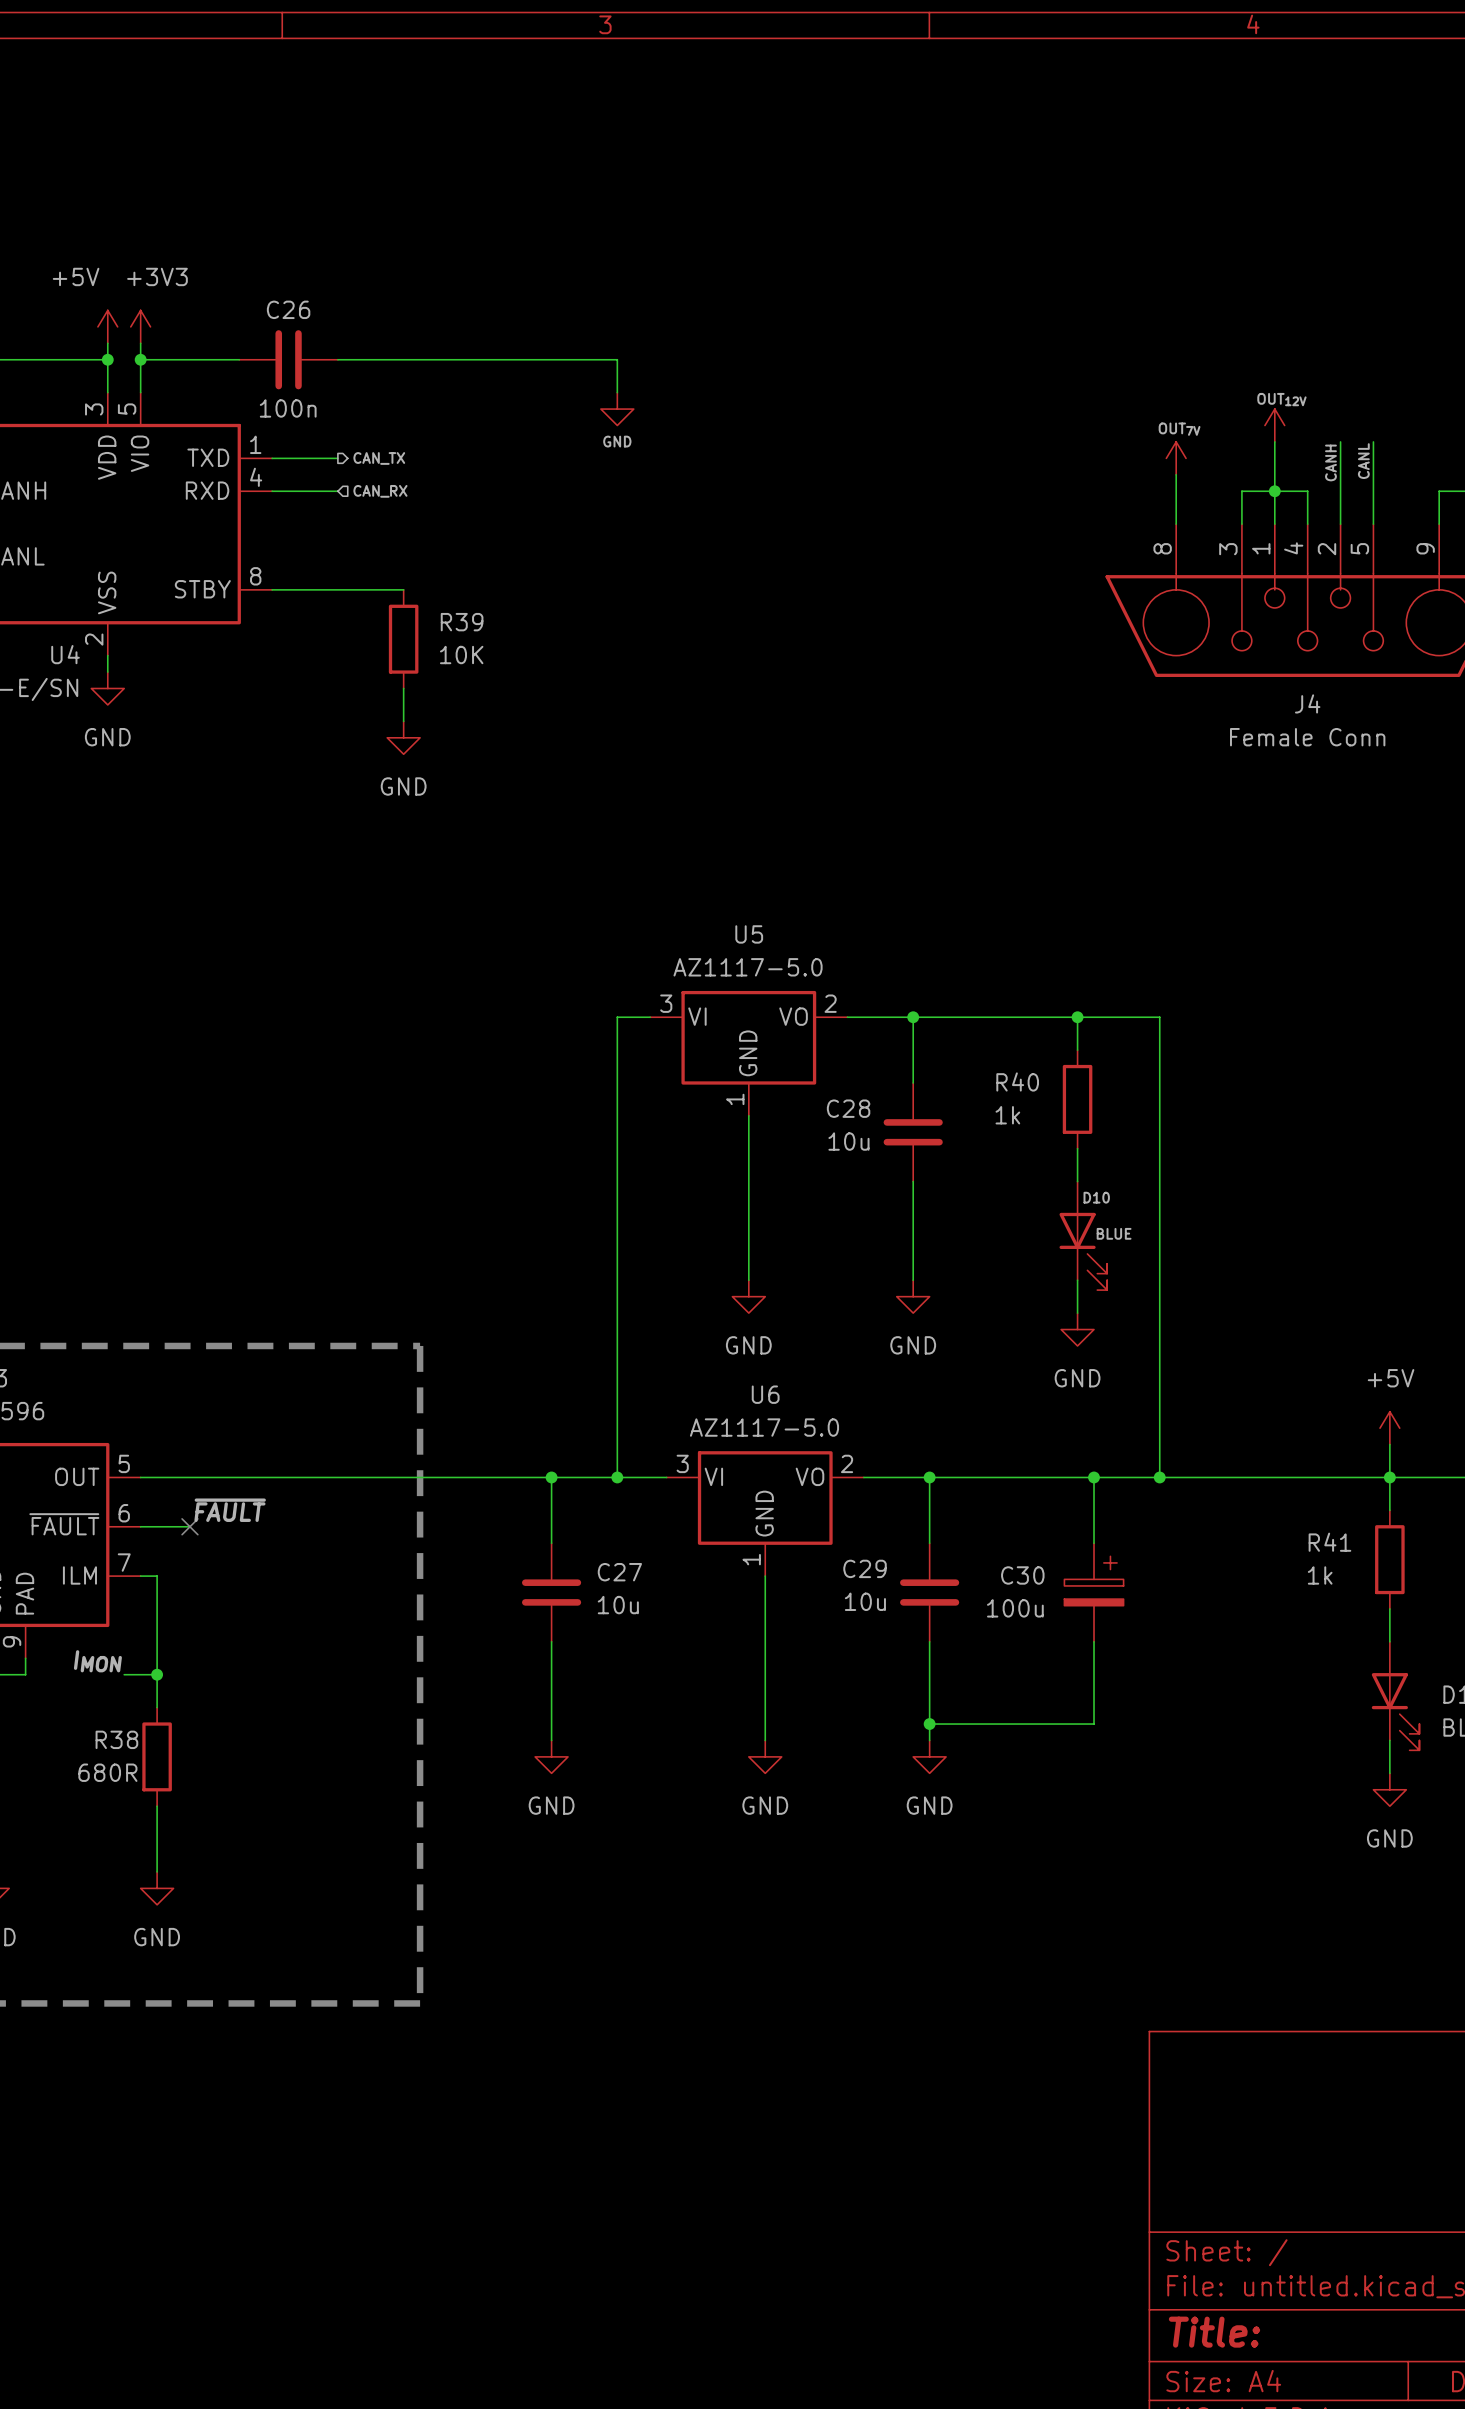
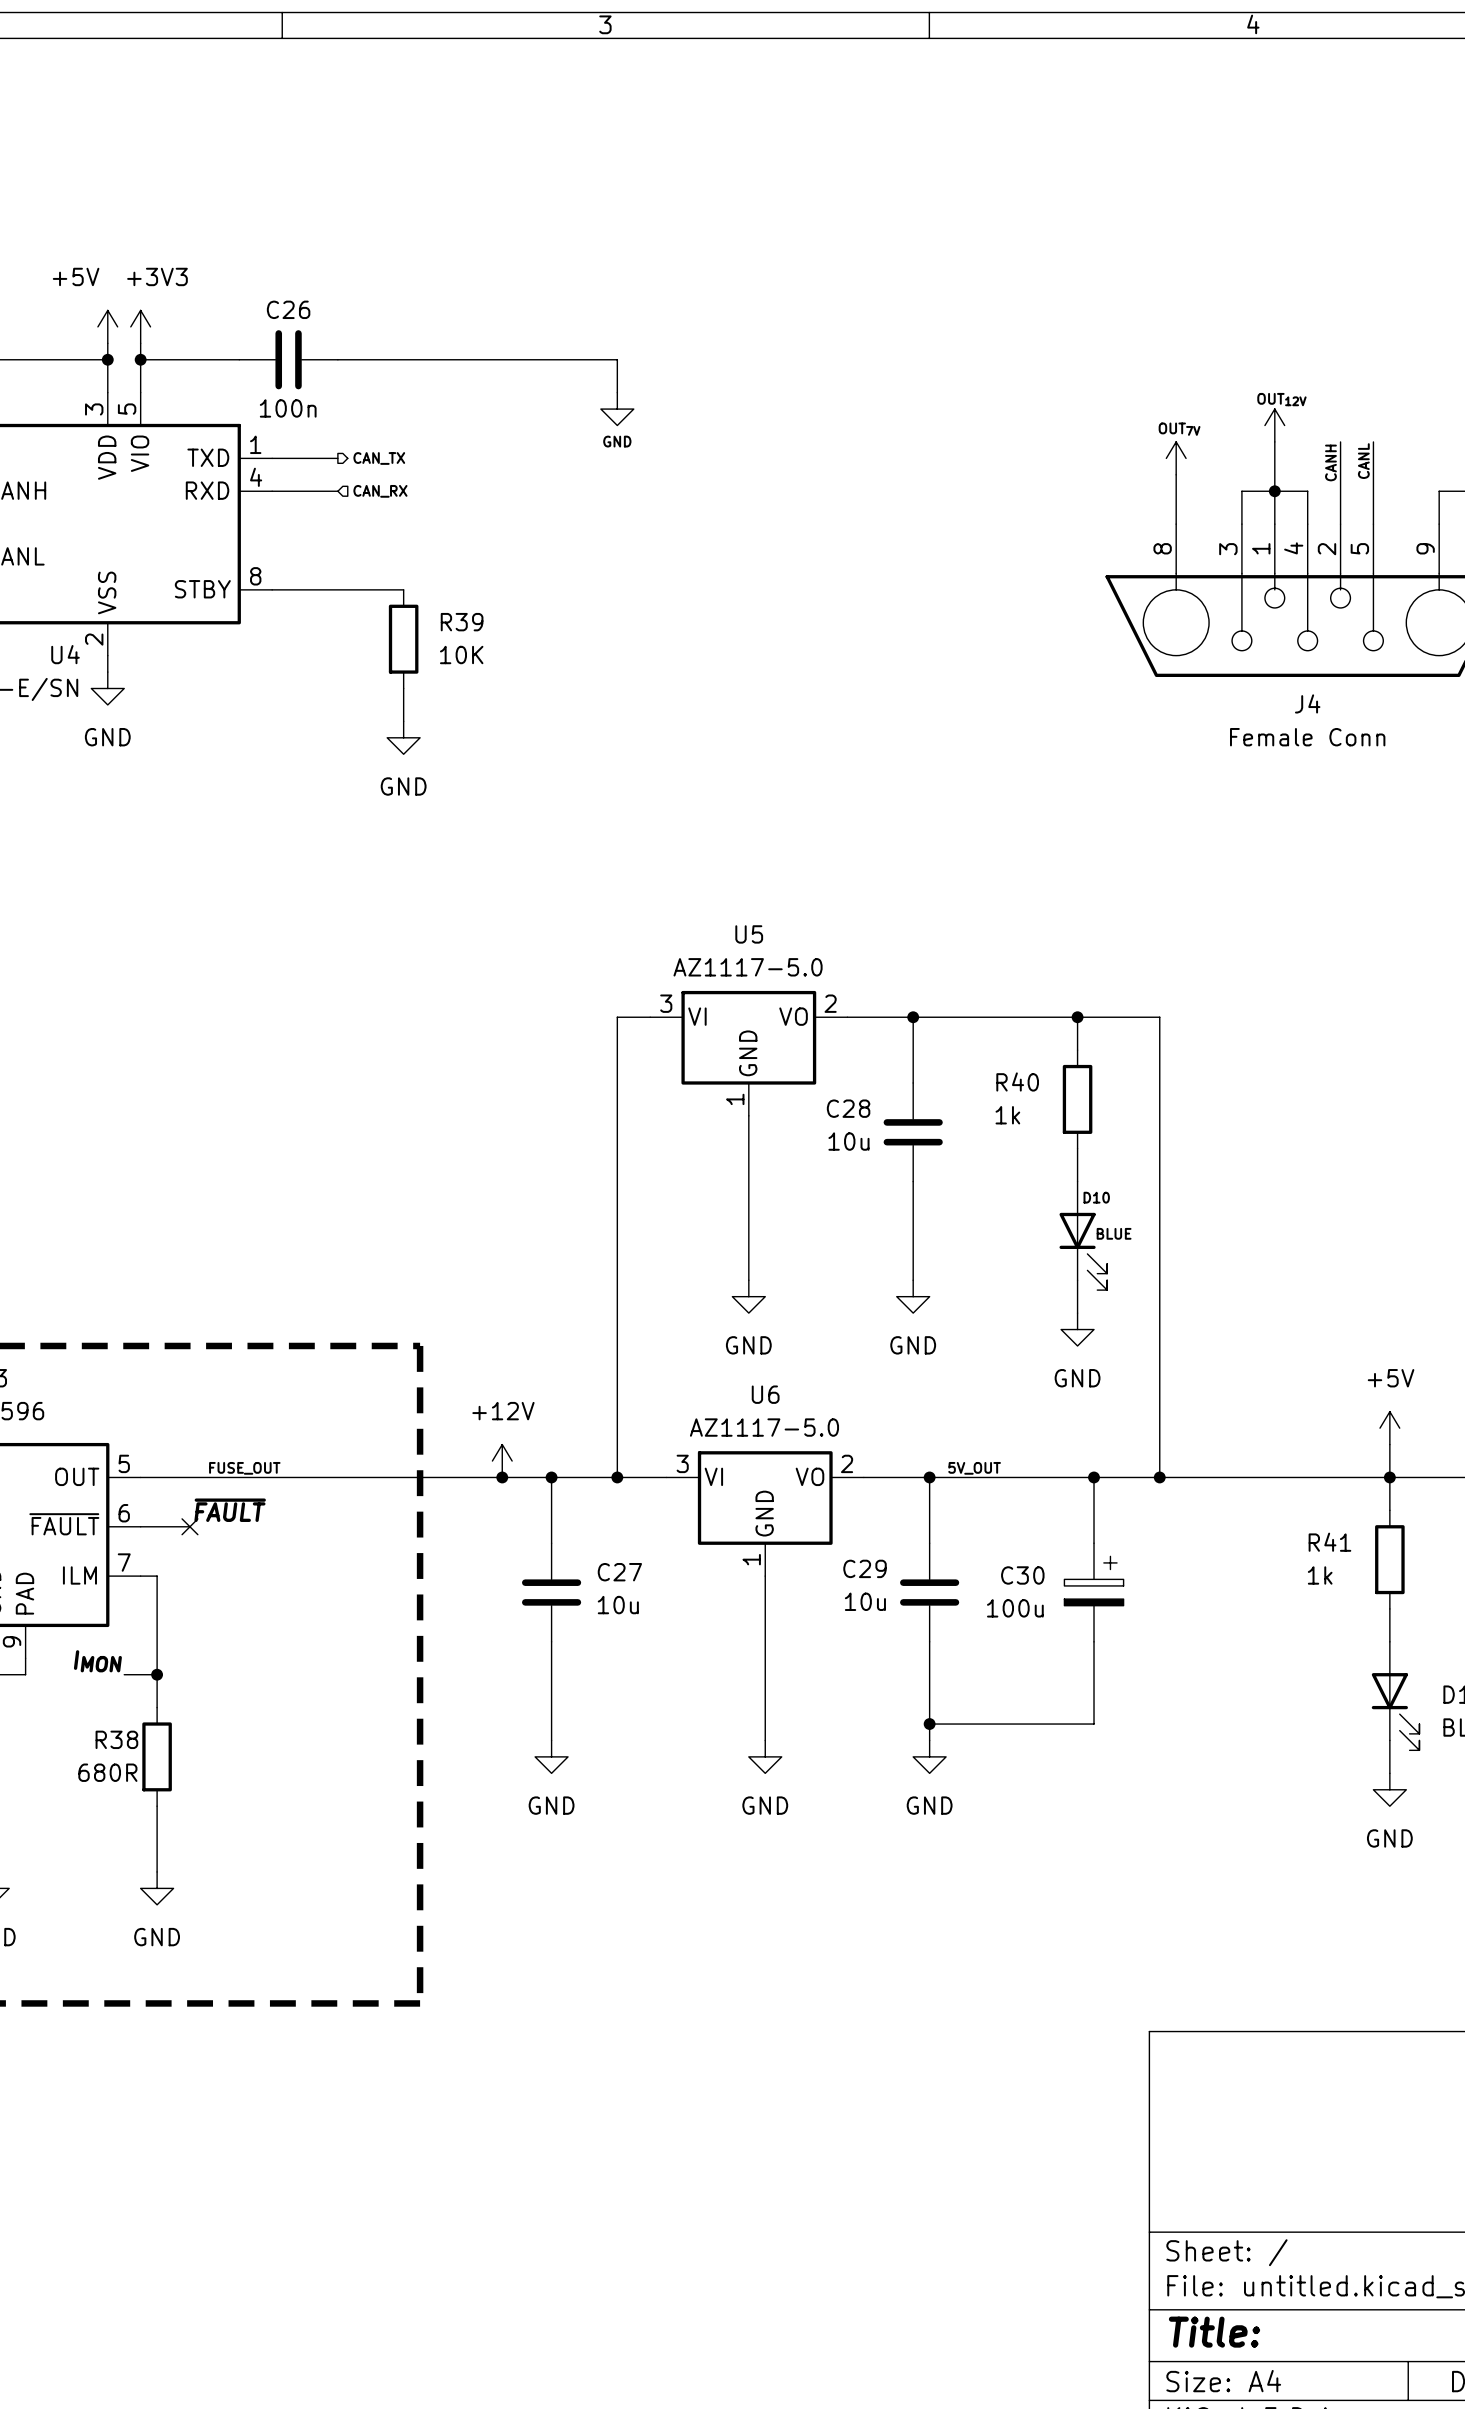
power symbol: none -> +12V (502, 1461)
label: none -> FUSE_OUT (244, 1468)
label: none -> 5V_OUT (974, 1468)
junction: none -> (502, 1477)

